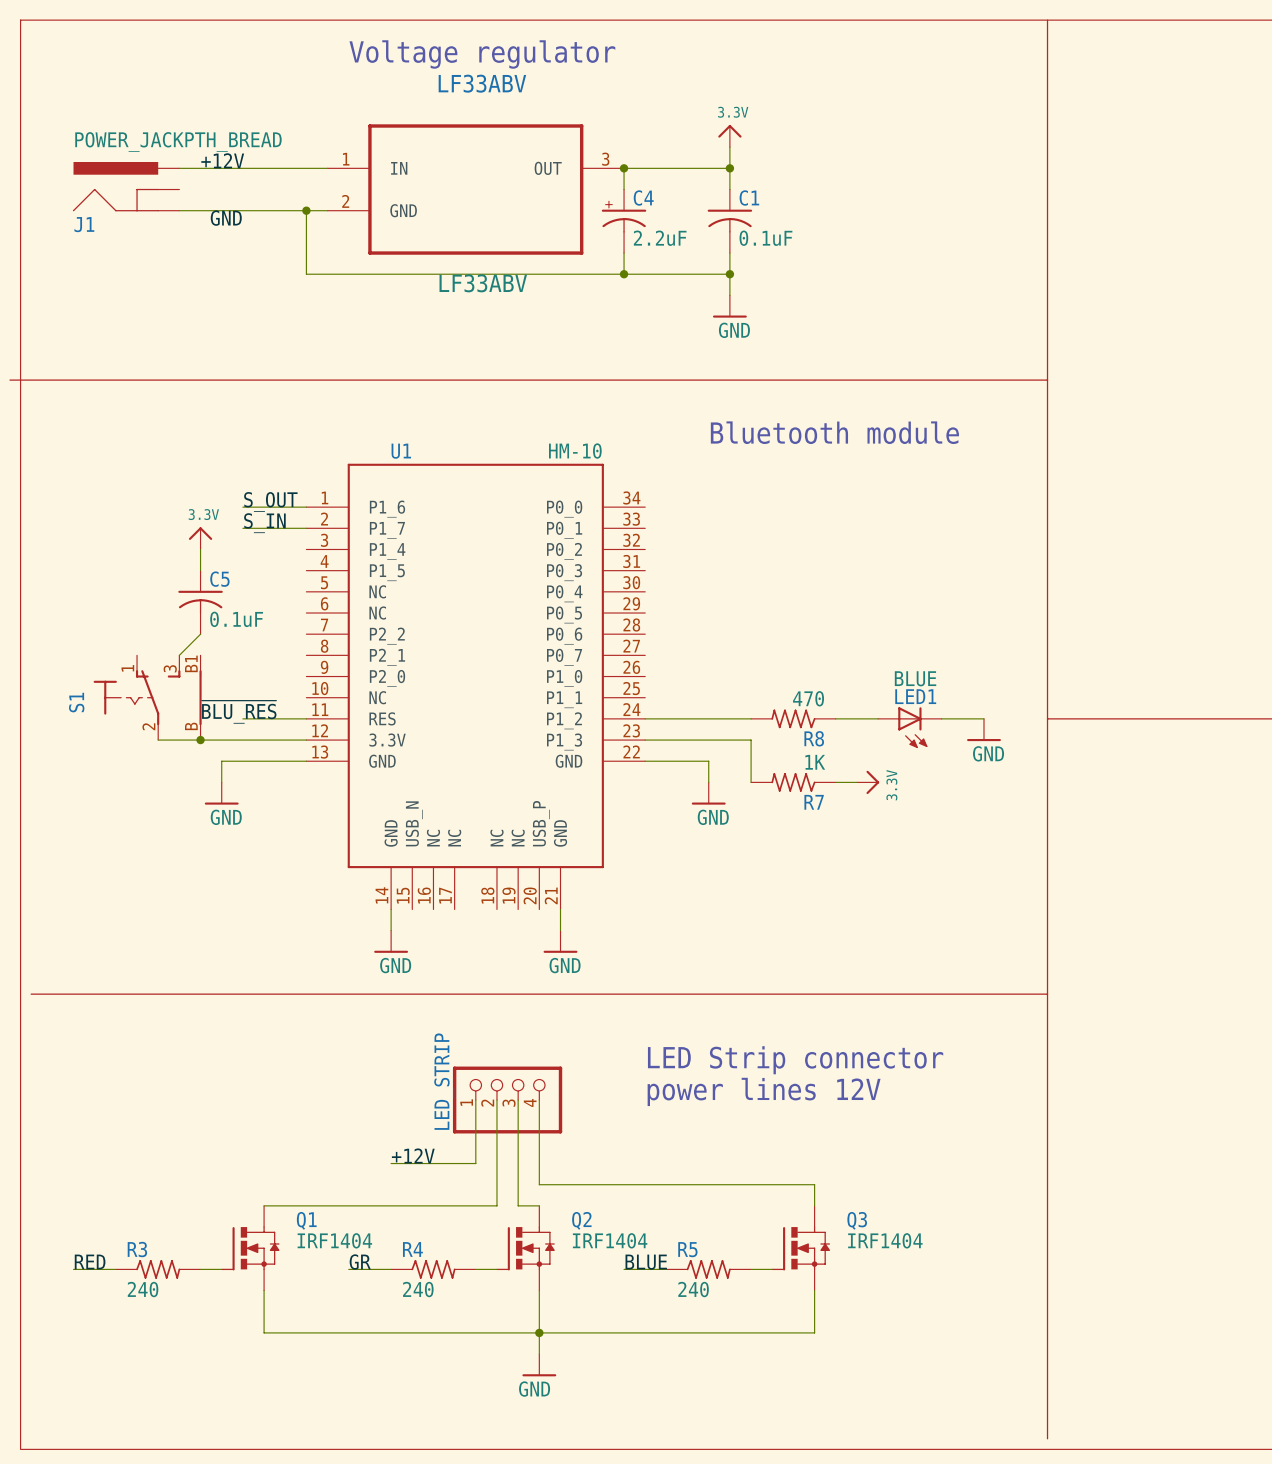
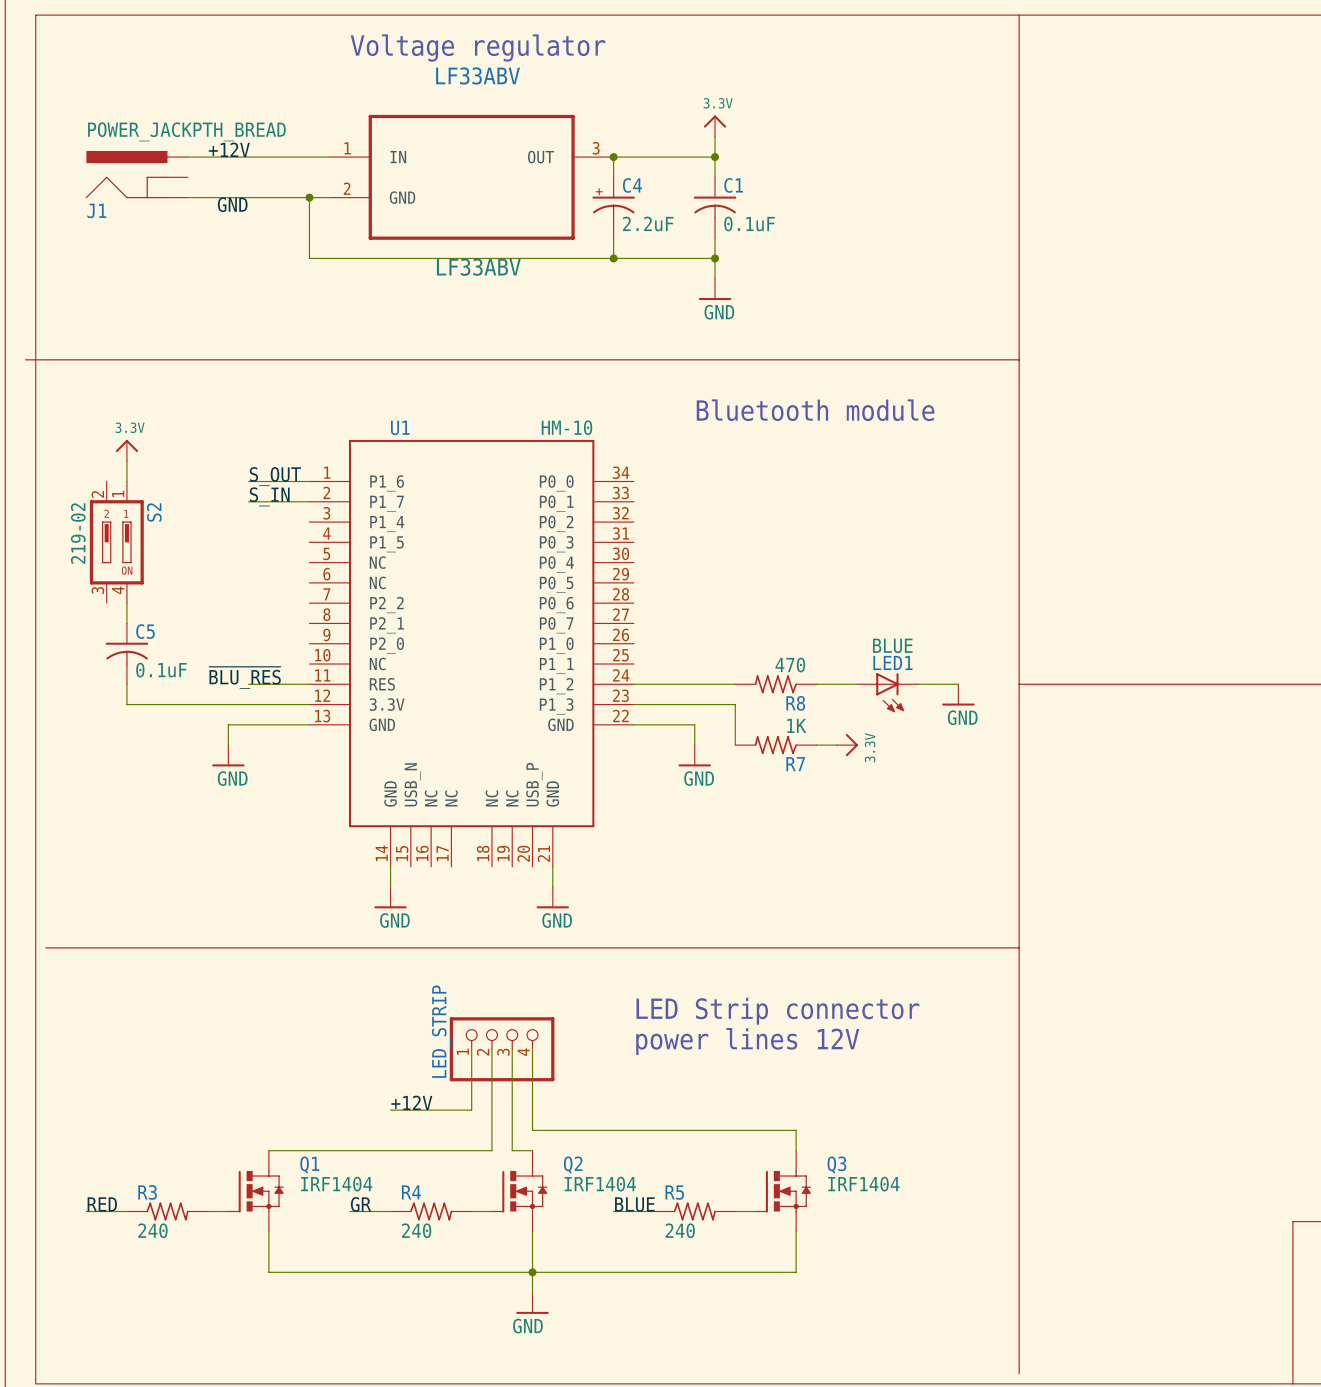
power symbol position: 3.3V (200, 538) -> 3.3V (126, 450)
wire: (200, 549) (200, 570) -> (126, 461) (126, 481)
S2: none -> 219-02 (116, 542)
C5 position: (200, 602) -> (126, 653)
wire: none -> (126, 603) (126, 623)
wire: (200, 634) (179, 655) -> none
S1: (147, 697) -> none
wire: none -> (126, 684) (126, 704) (167, 704)
junction: (200, 740) -> none

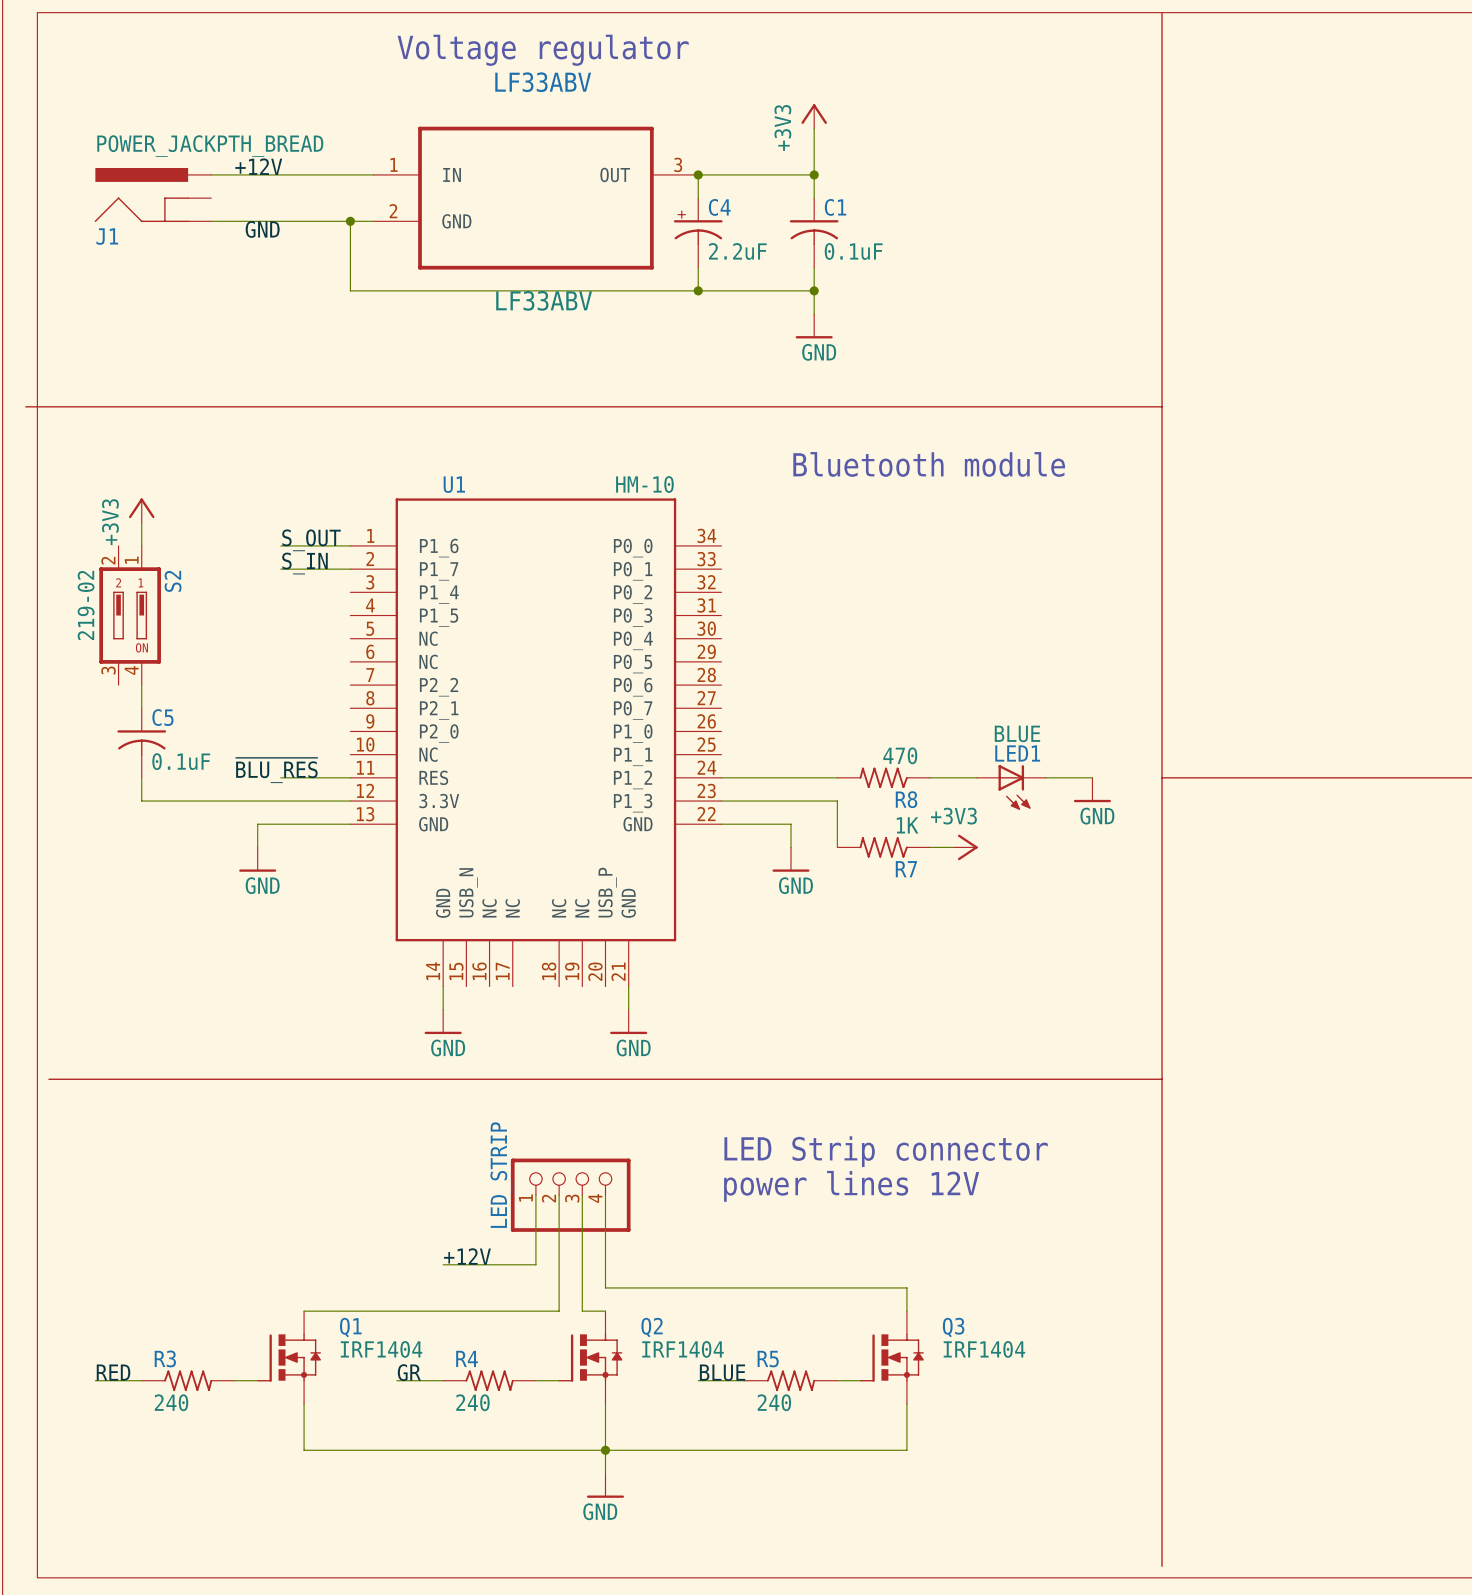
power symbol: none -> +3V3 (814, 116)
power symbol: 3.3V (715, 126) -> none
power symbol: 3.3V (126, 450) -> +3V3 (141, 510)
power symbol: 3.3V (847, 745) -> +3V3 (965, 847)

